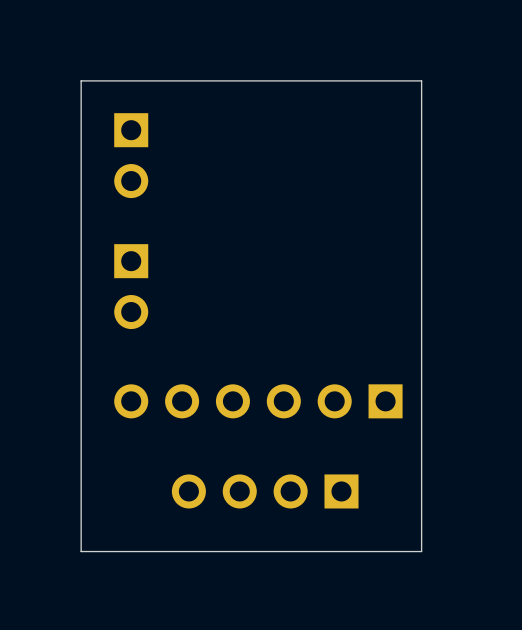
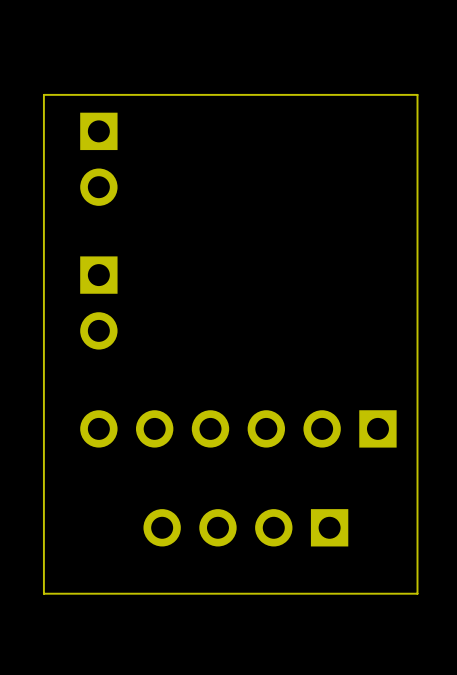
board edge: (421, 96) (421, 80) (81, 80) (81, 96) -> (417, 94) (43, 94)

